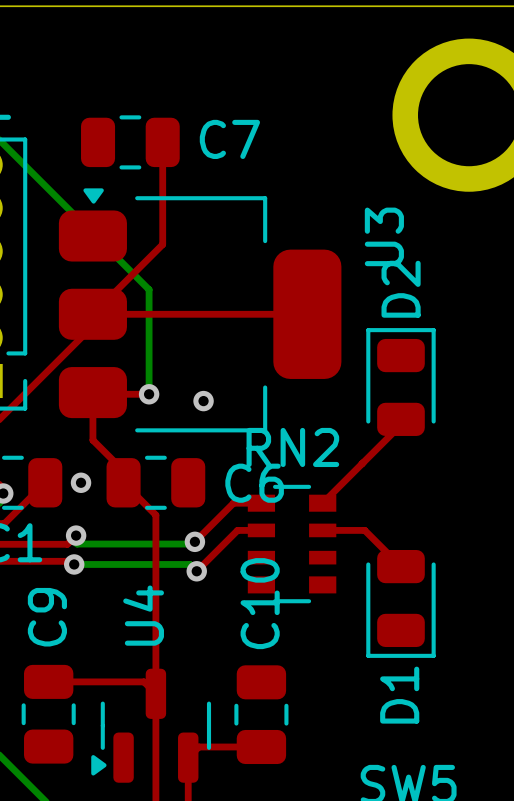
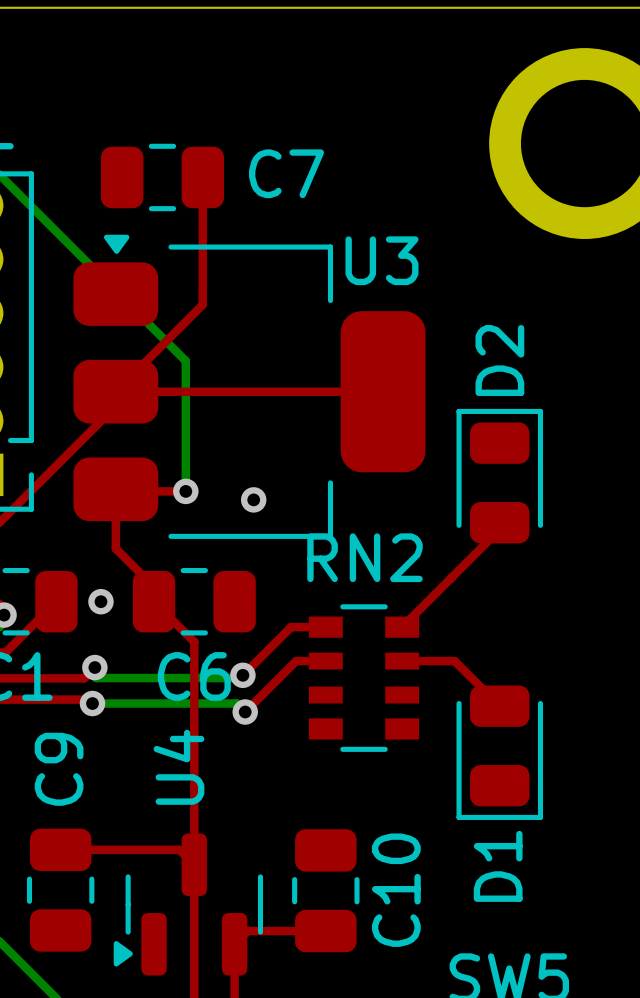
U3 name rotation: 0° (384, 236) -> 90° clockwise (381, 260)
C6 name position: C6 (254, 483) -> C6 (194, 676)
C10 name position: C10 (260, 603) -> C10 (396, 890)

